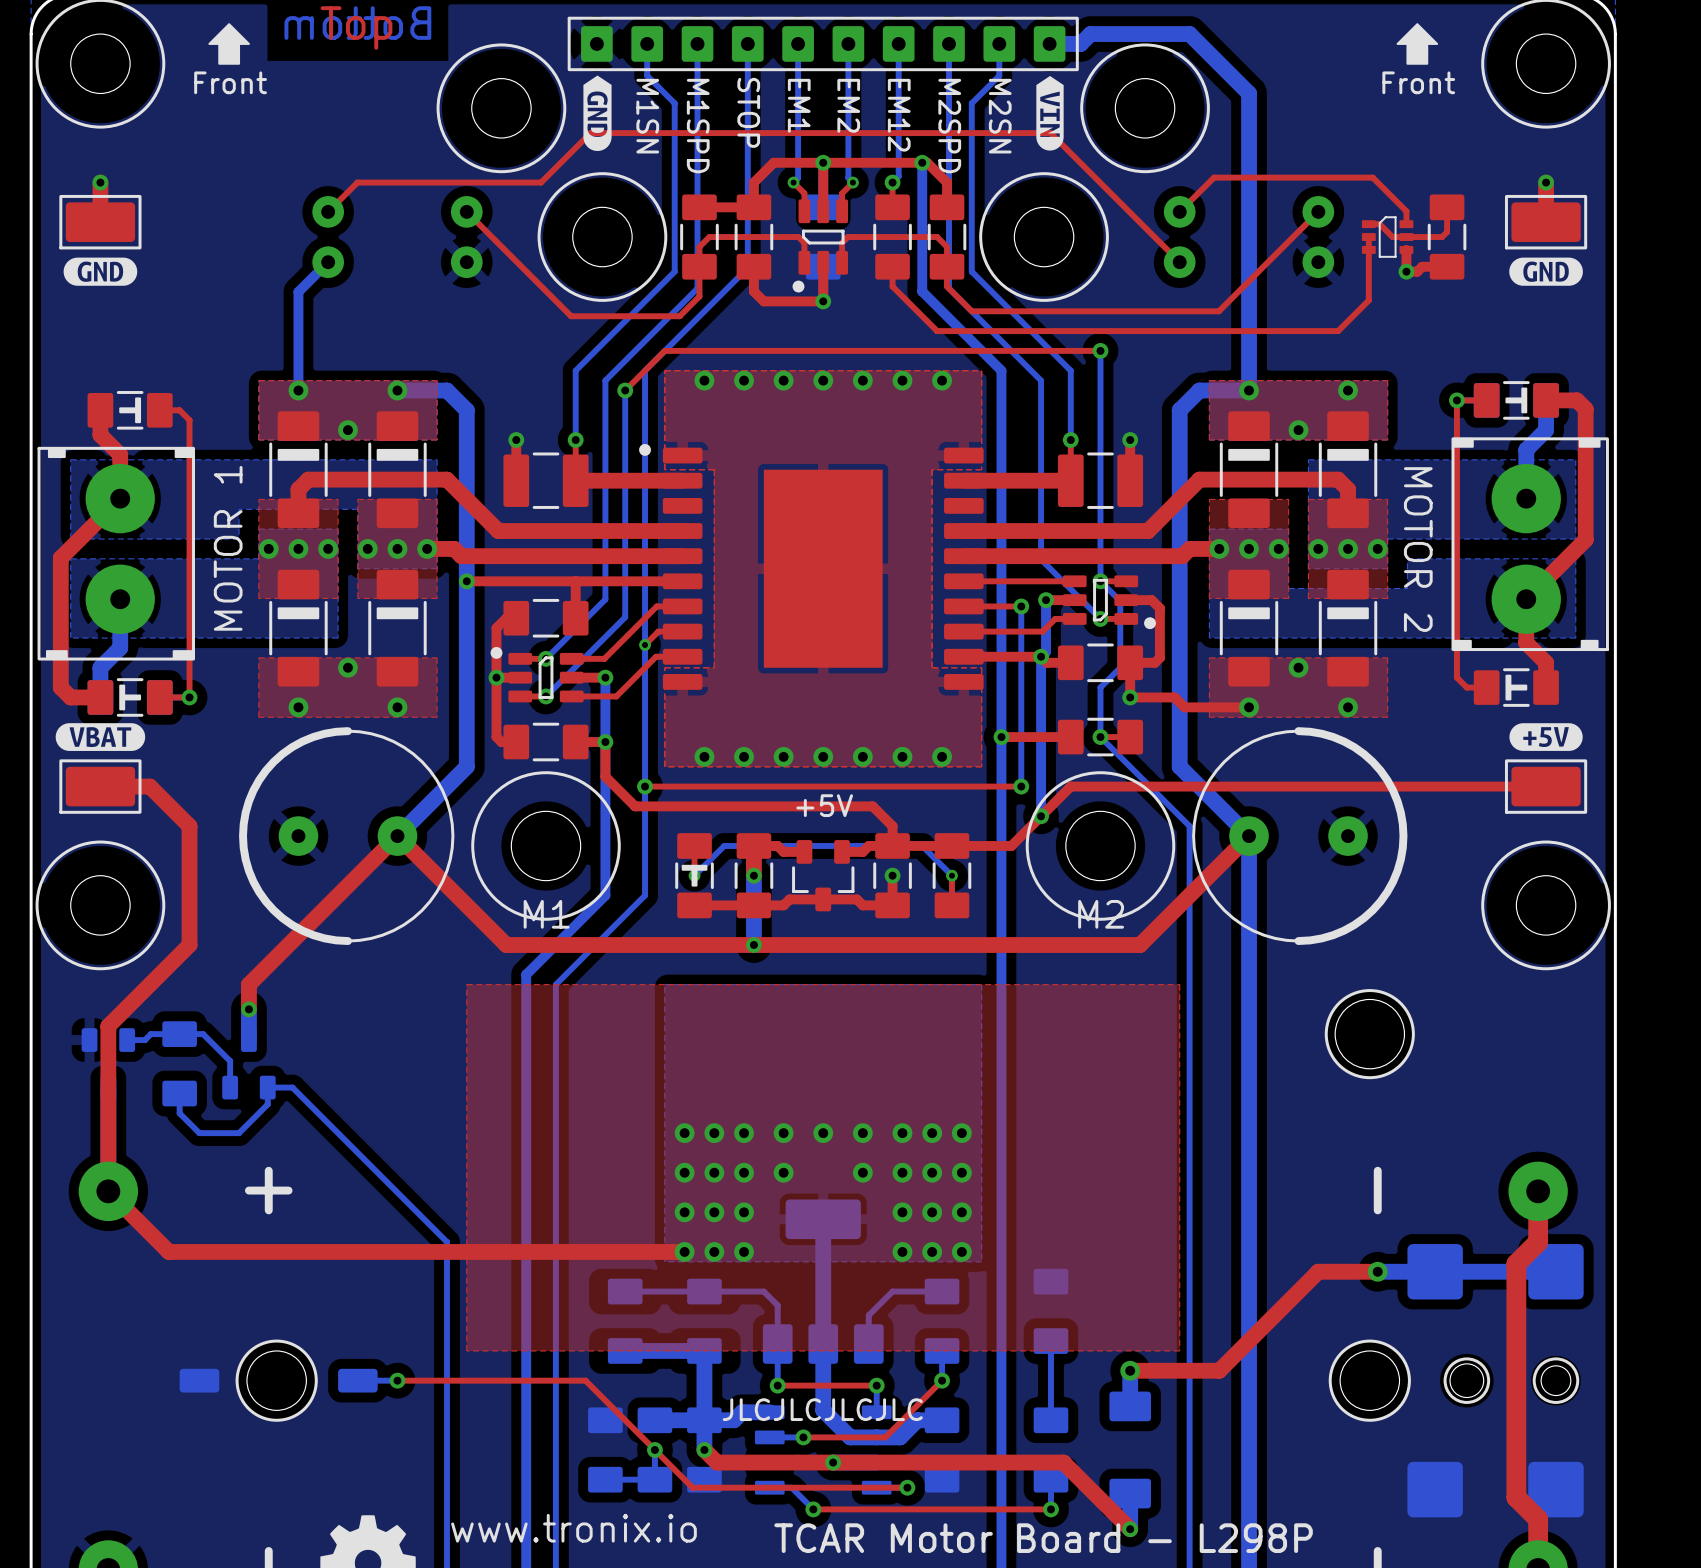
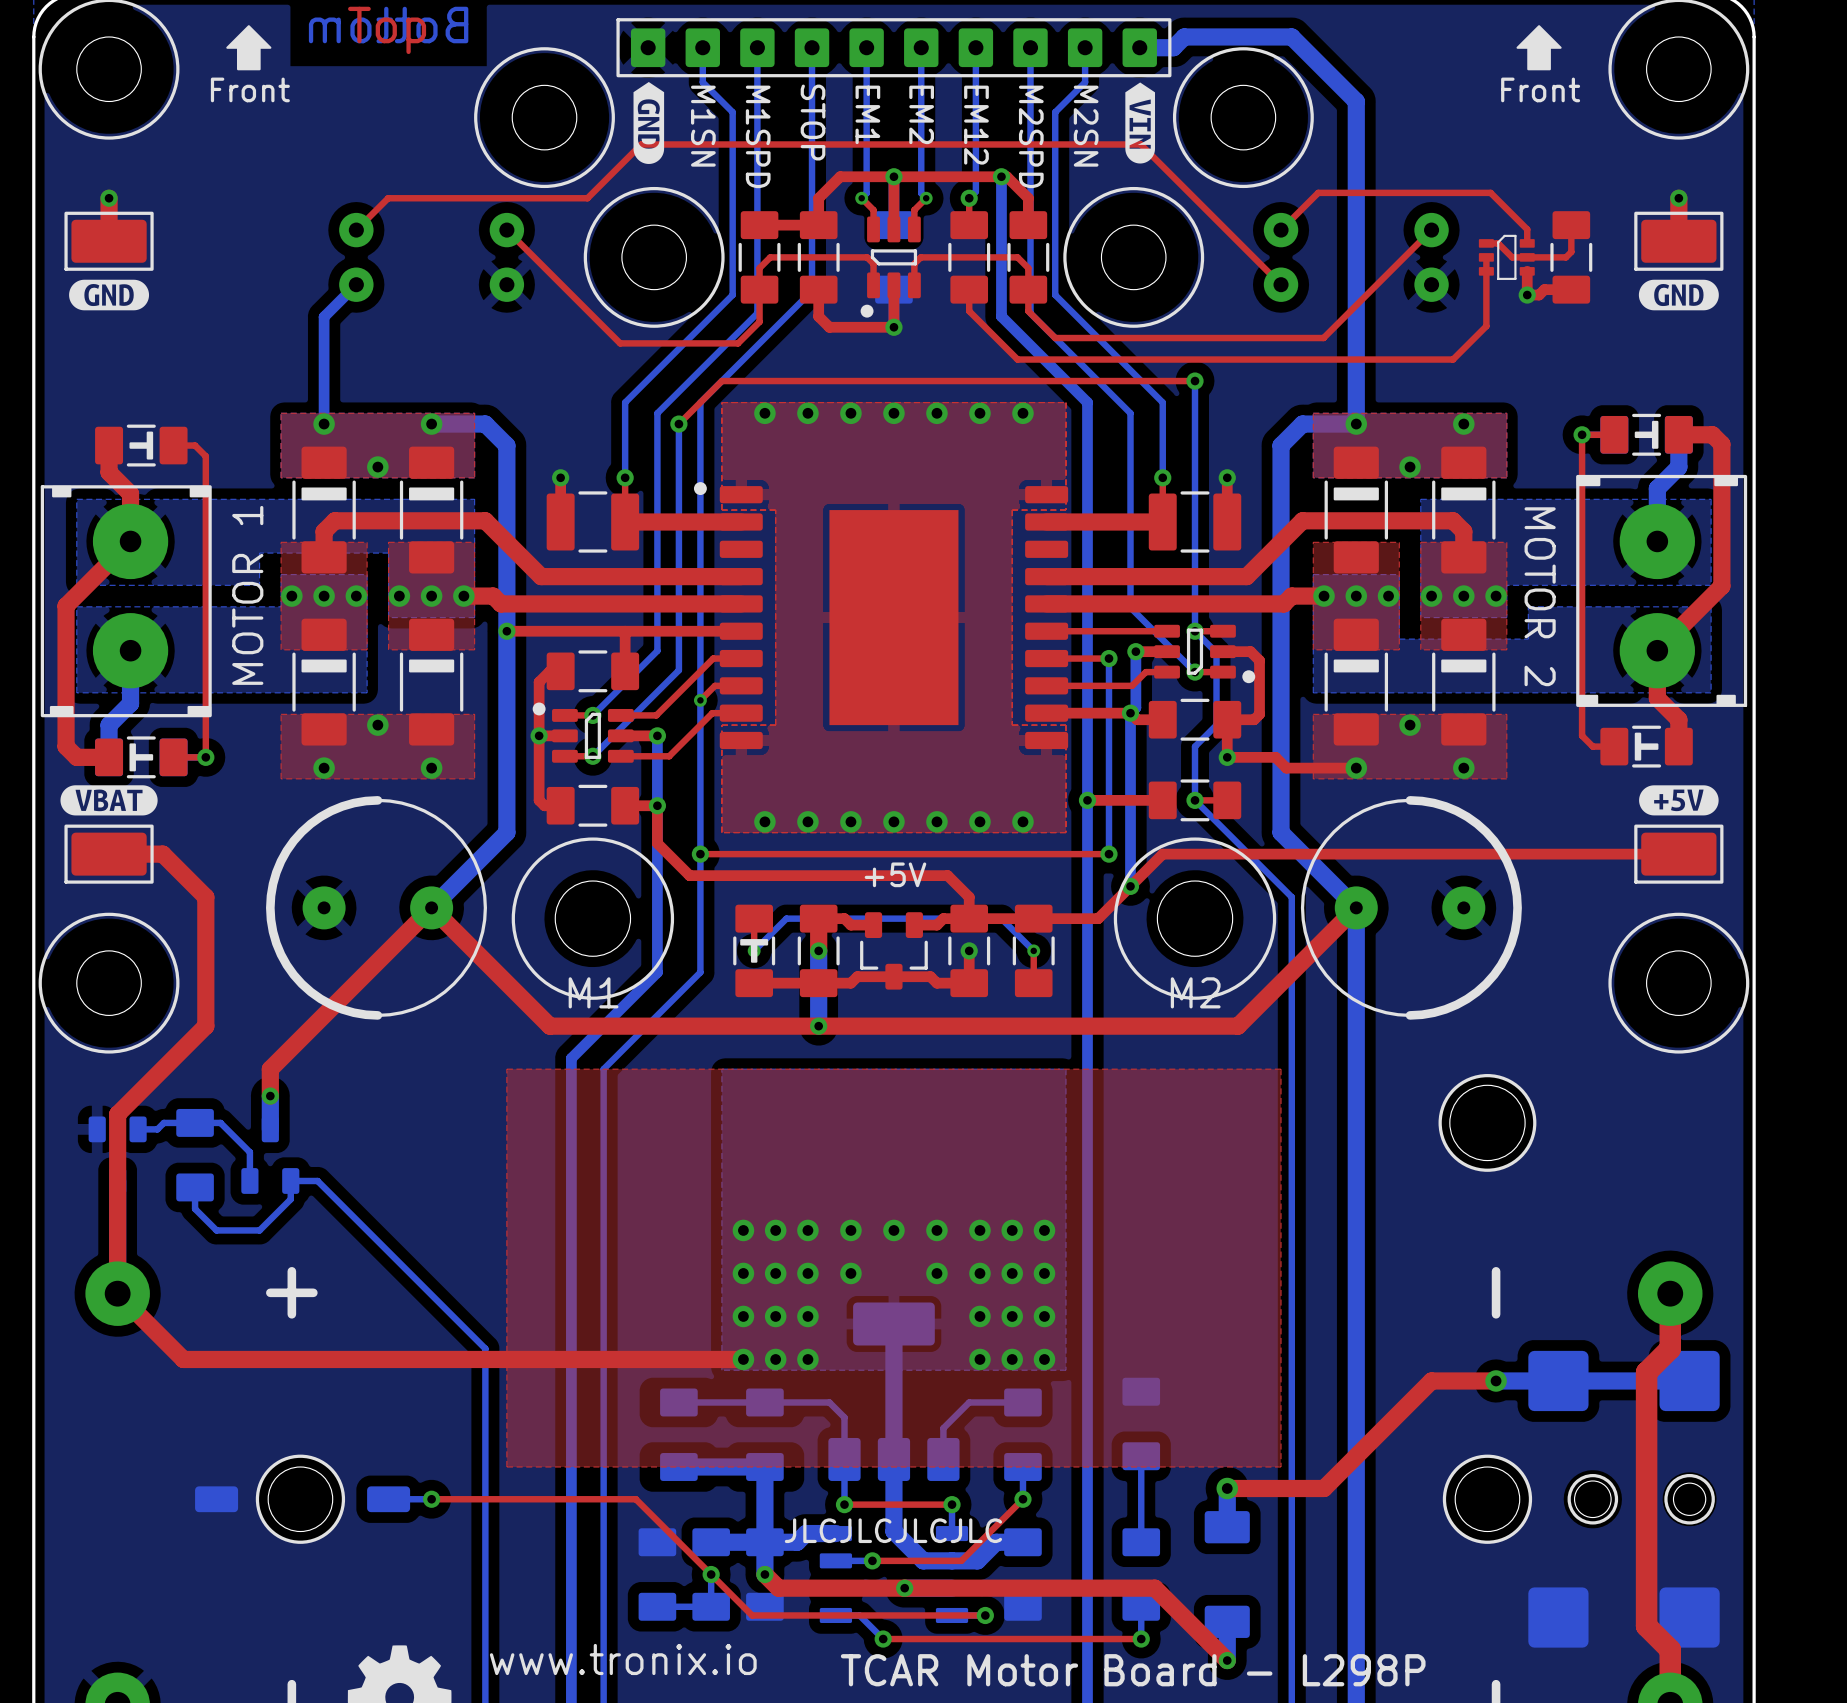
part footprint: [239, 727, 455, 946] -> [266, 796, 487, 1020]
part footprint: [1192, 727, 1408, 946] -> [1300, 796, 1522, 1020]

